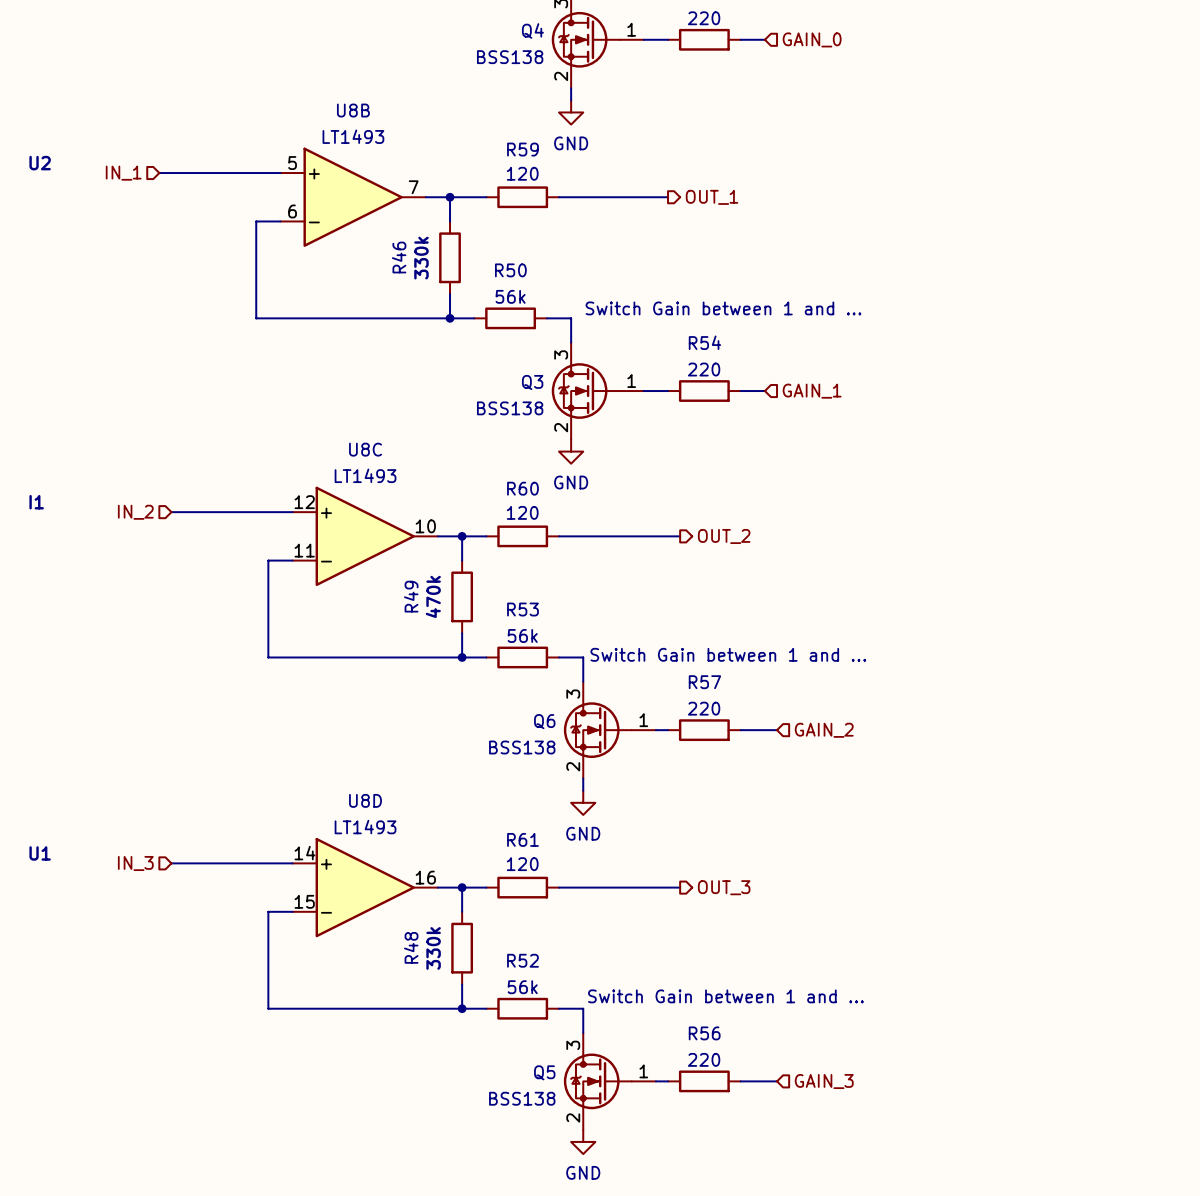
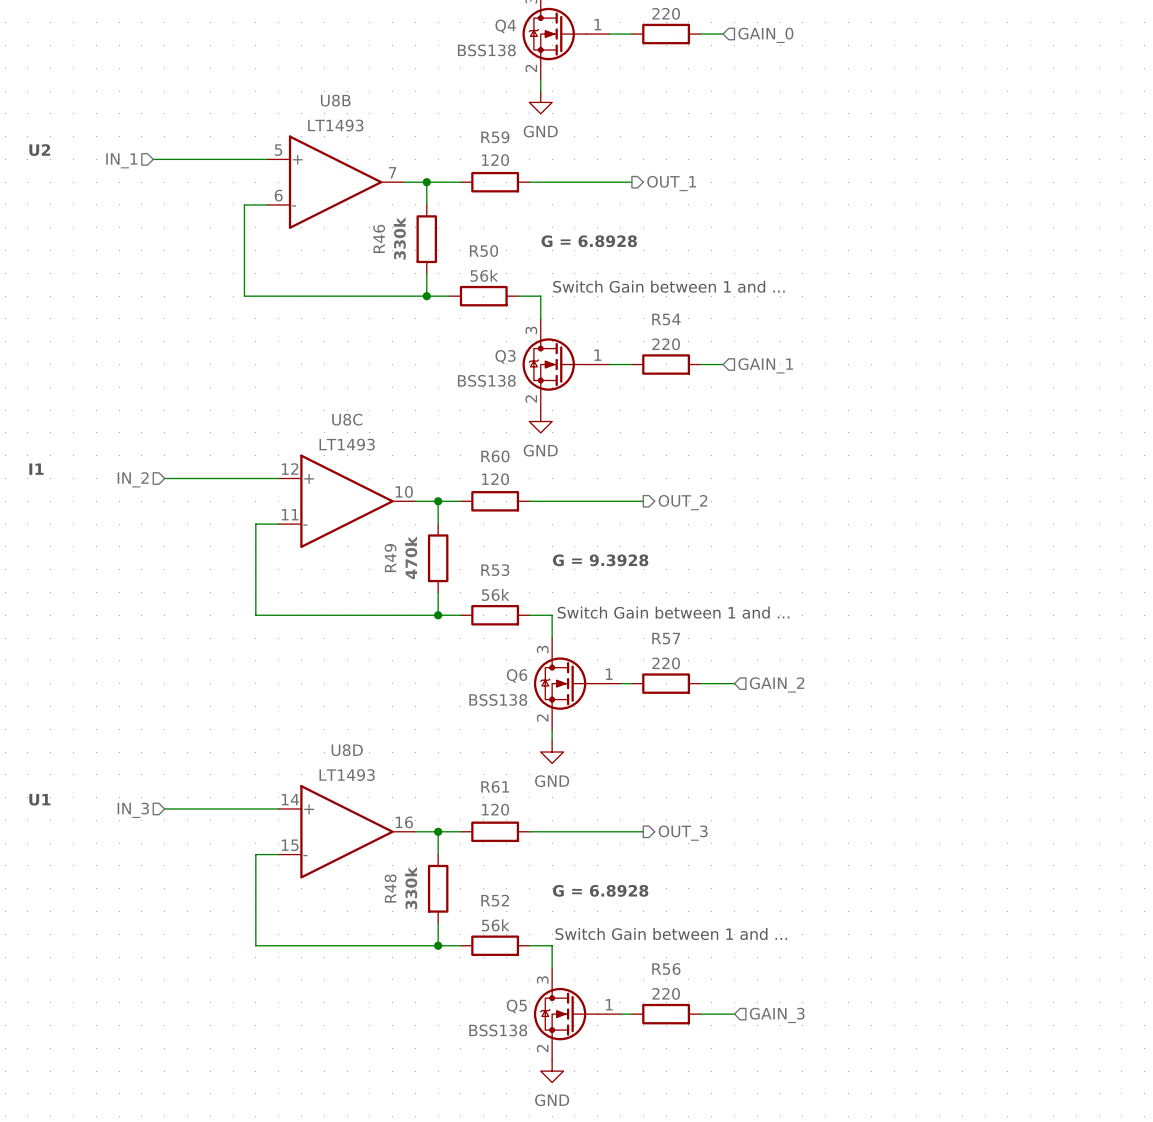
text: none -> G = 6.8928 (589, 241)
text: none -> G = 9.3928 (600, 560)
text: none -> G = 6.8928 (600, 890)

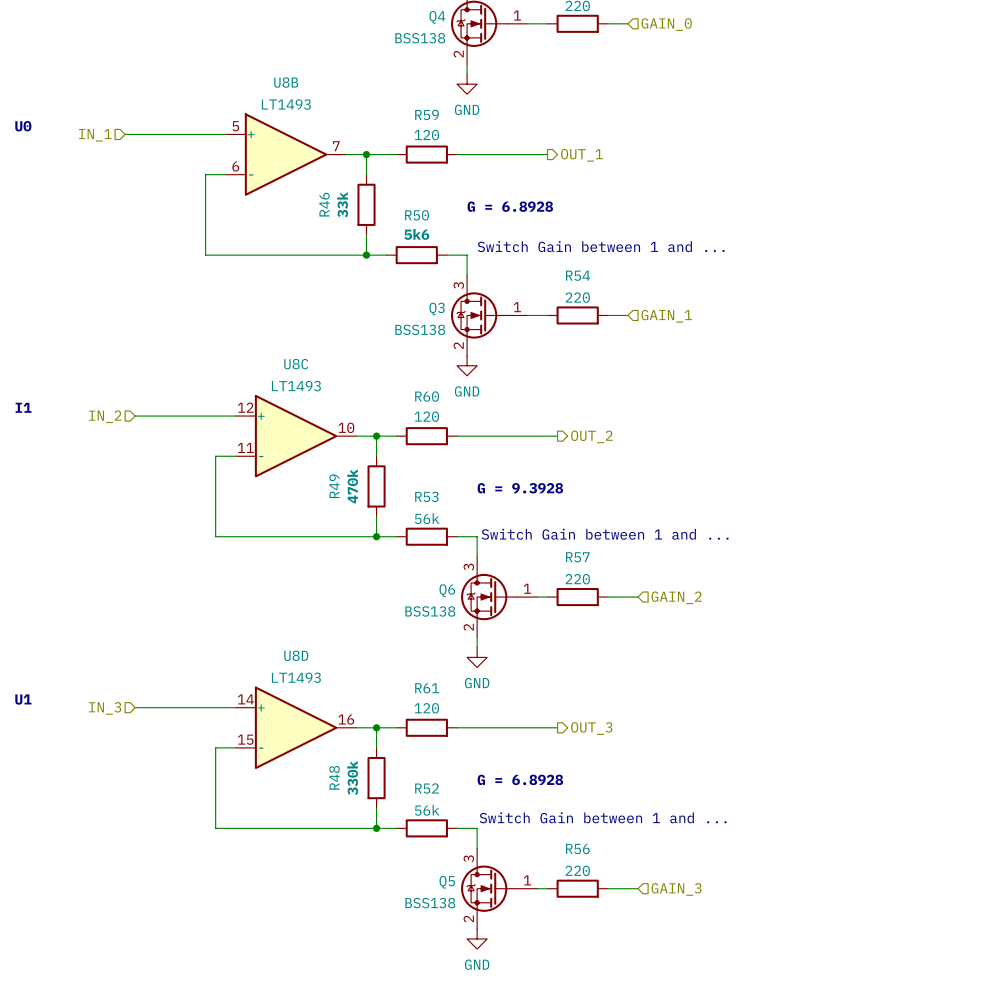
text: U2 (39, 150) -> U0 (23, 126)
R46 value: 330k (399, 238) -> 33k (342, 204)
R50 value: 56k (484, 275) -> 5k6 (416, 234)

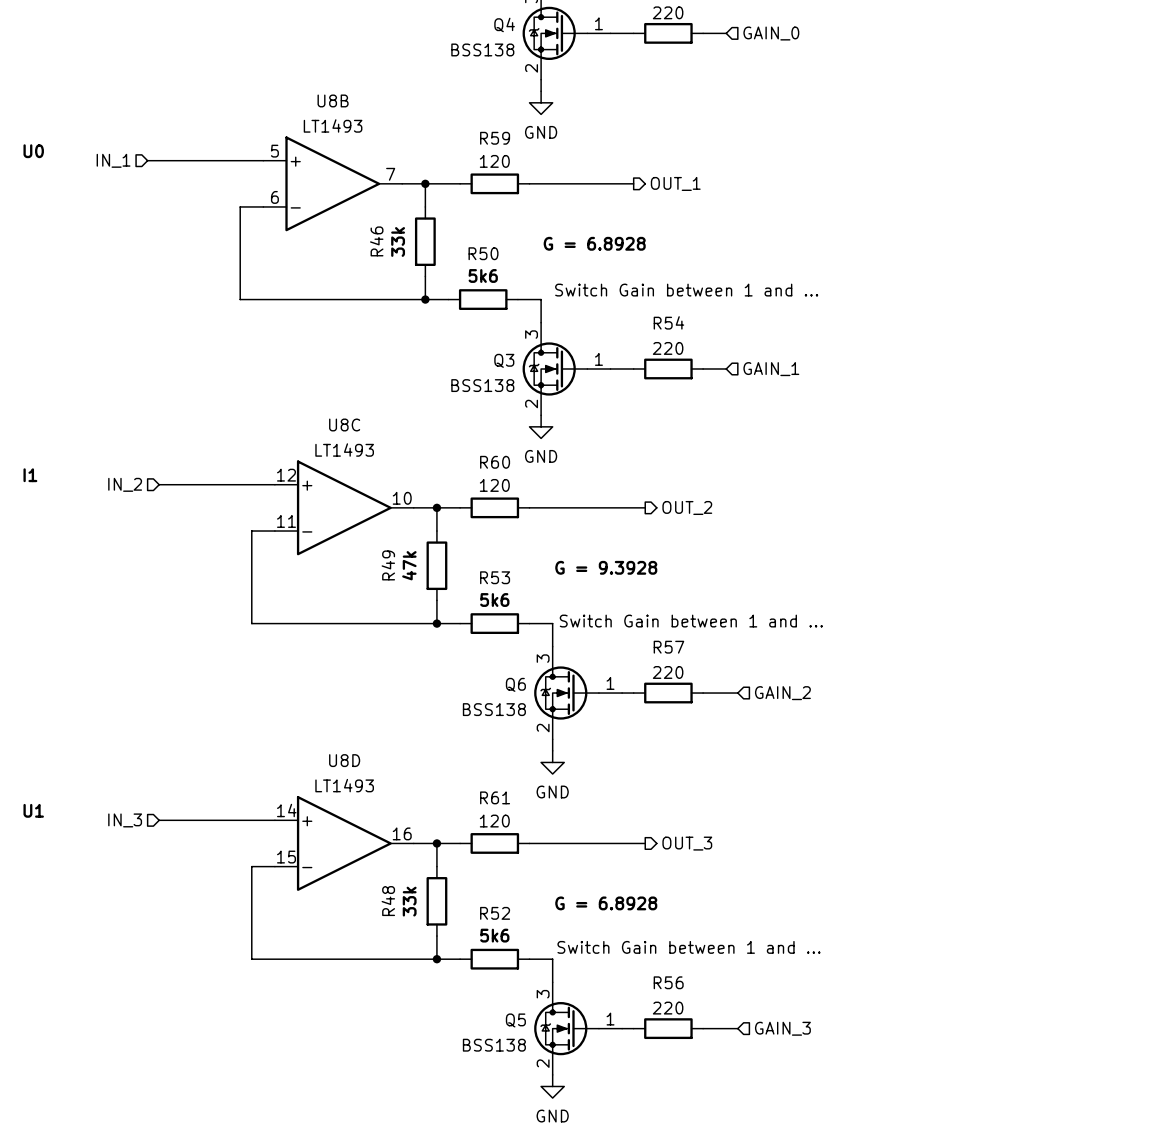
R49 value: 470k (352, 486) -> 47k (409, 565)
R53 value: 56k (427, 518) -> 5k6 (494, 600)
R48 value: 330k (352, 777) -> 33k (409, 901)
R52 value: 56k (427, 810) -> 5k6 (494, 935)

